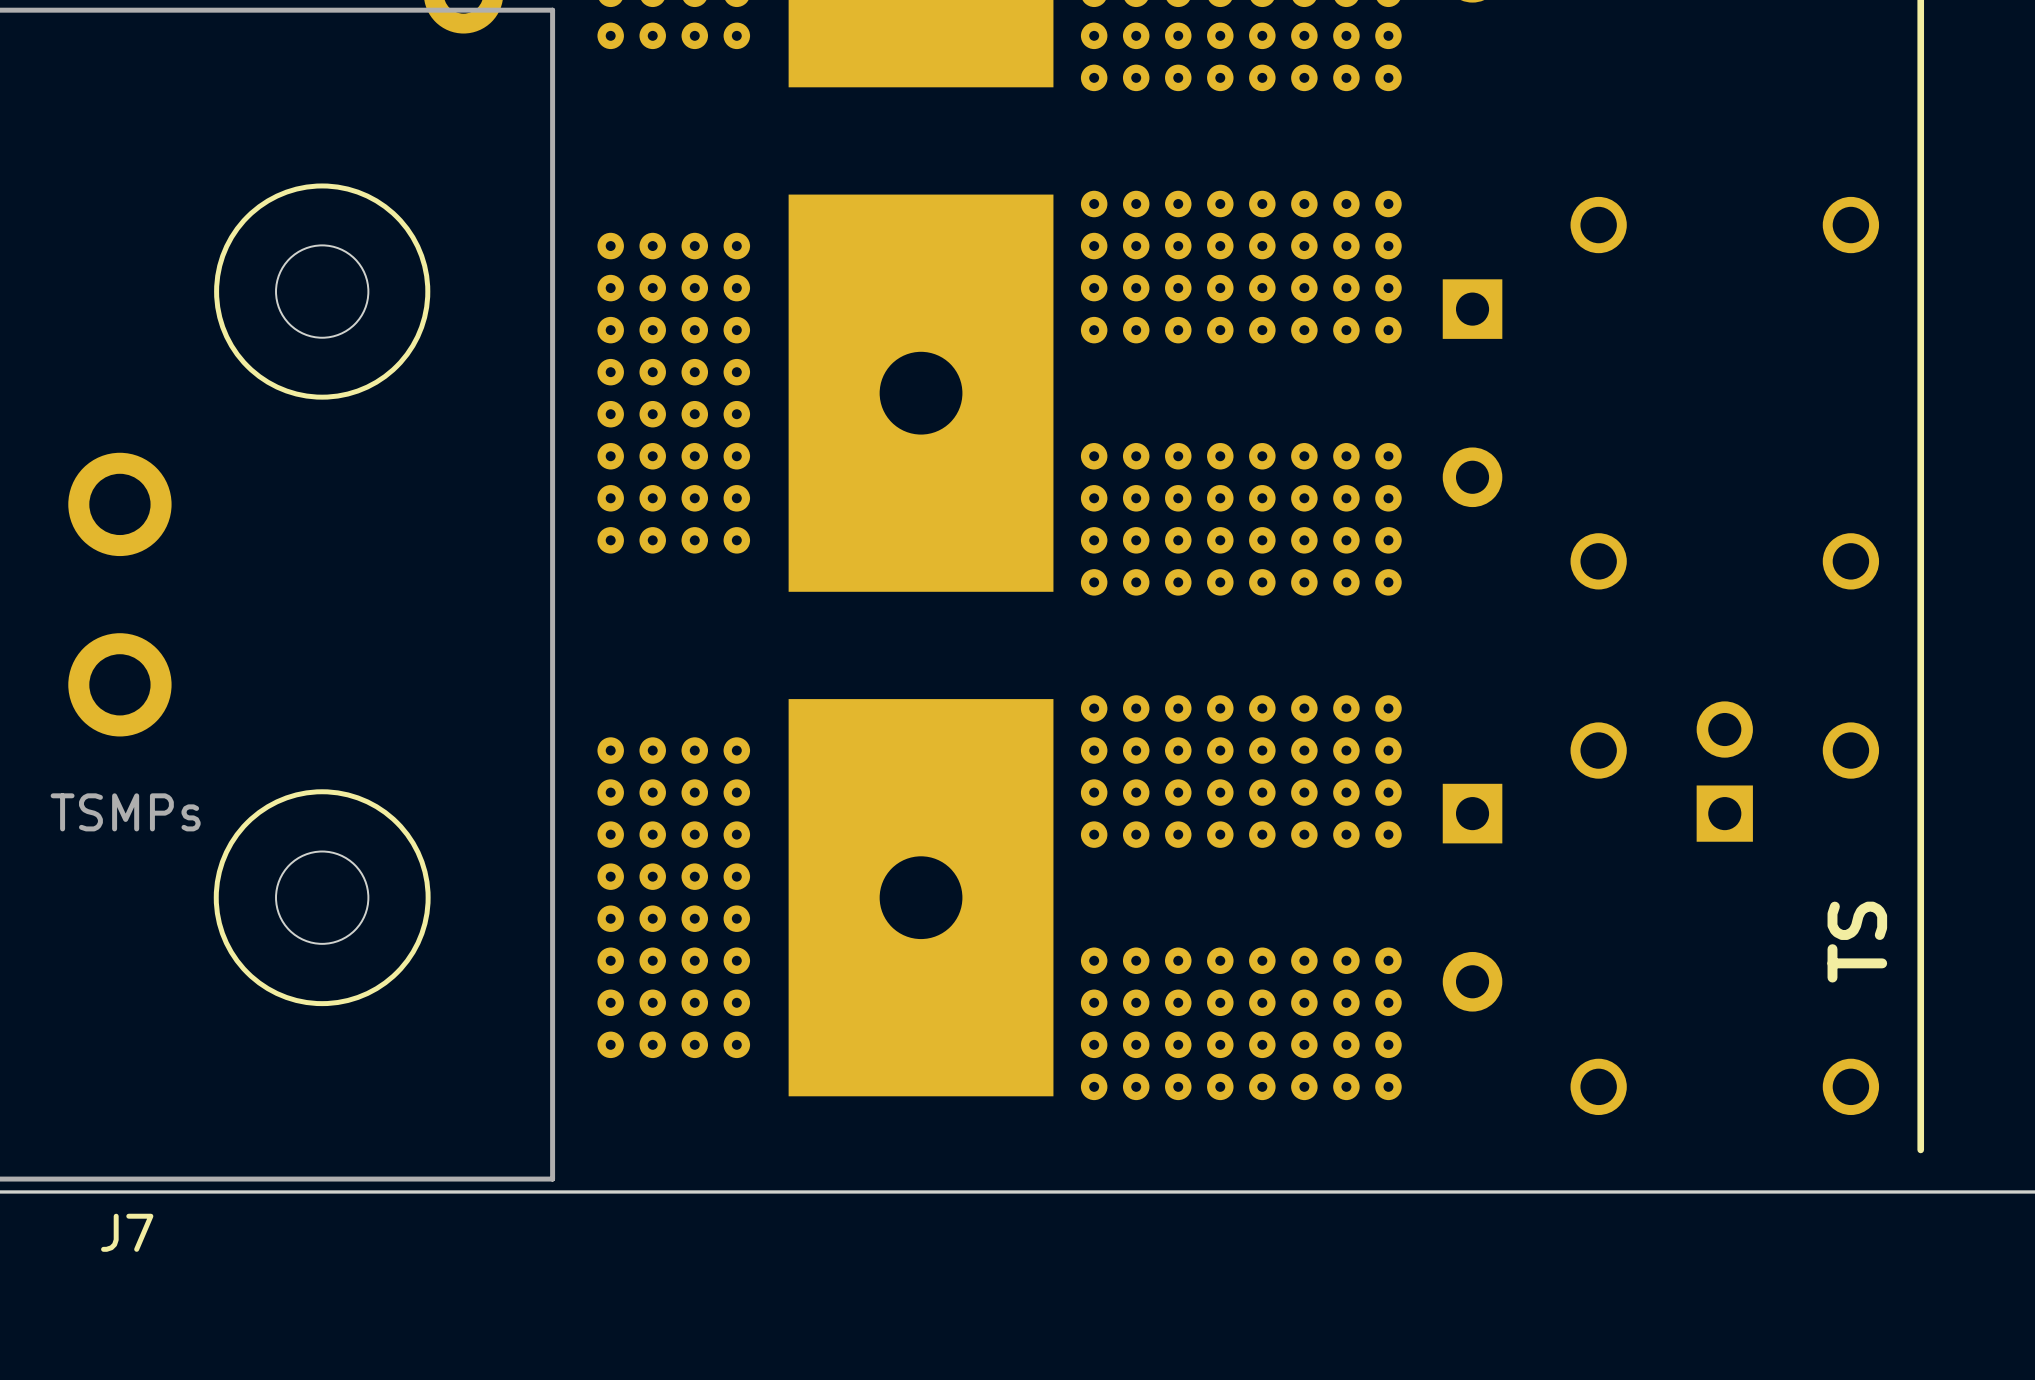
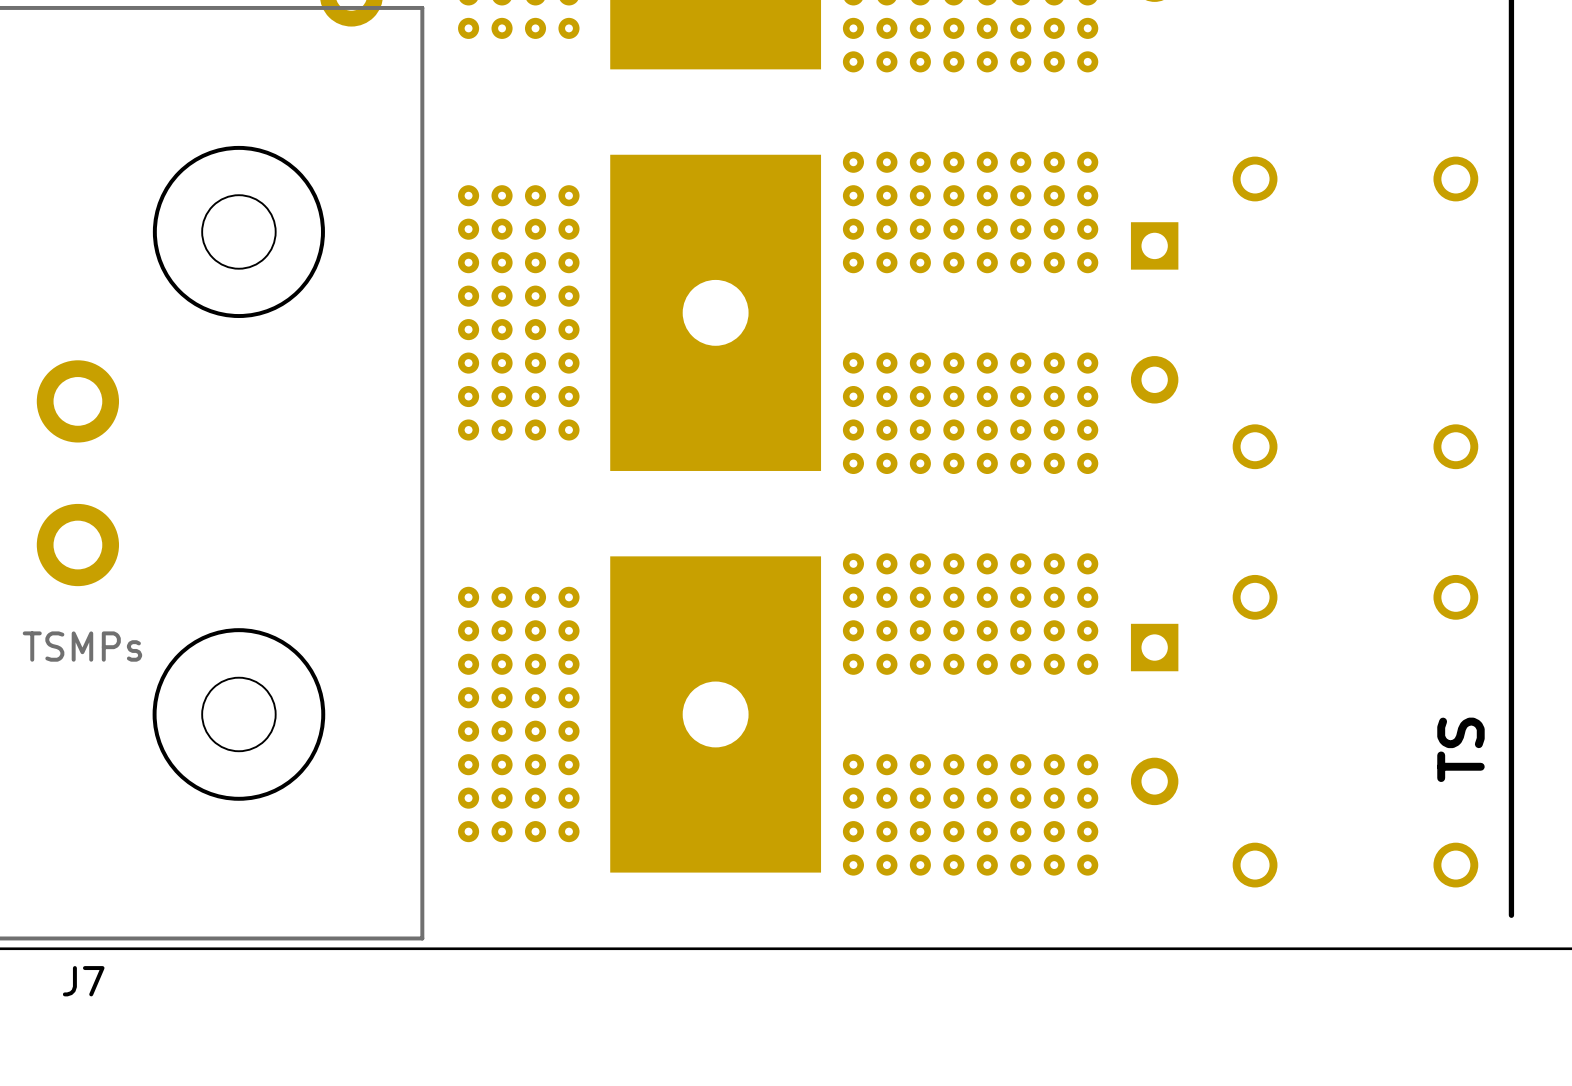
part: (1724, 771) -> none

